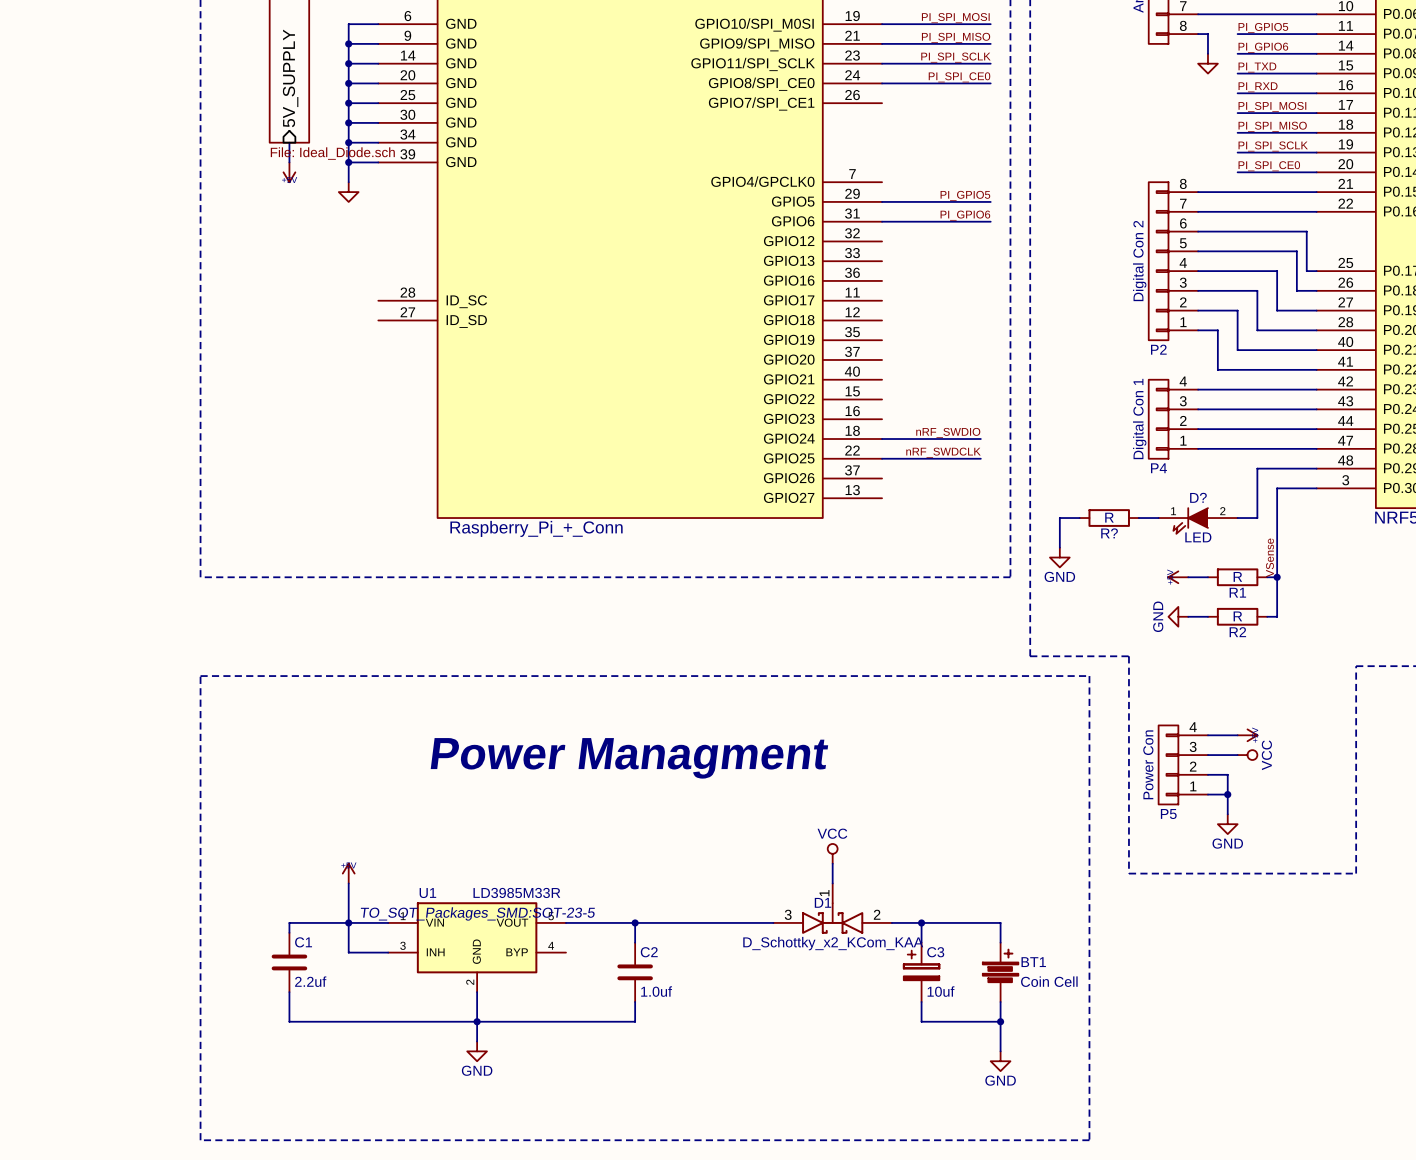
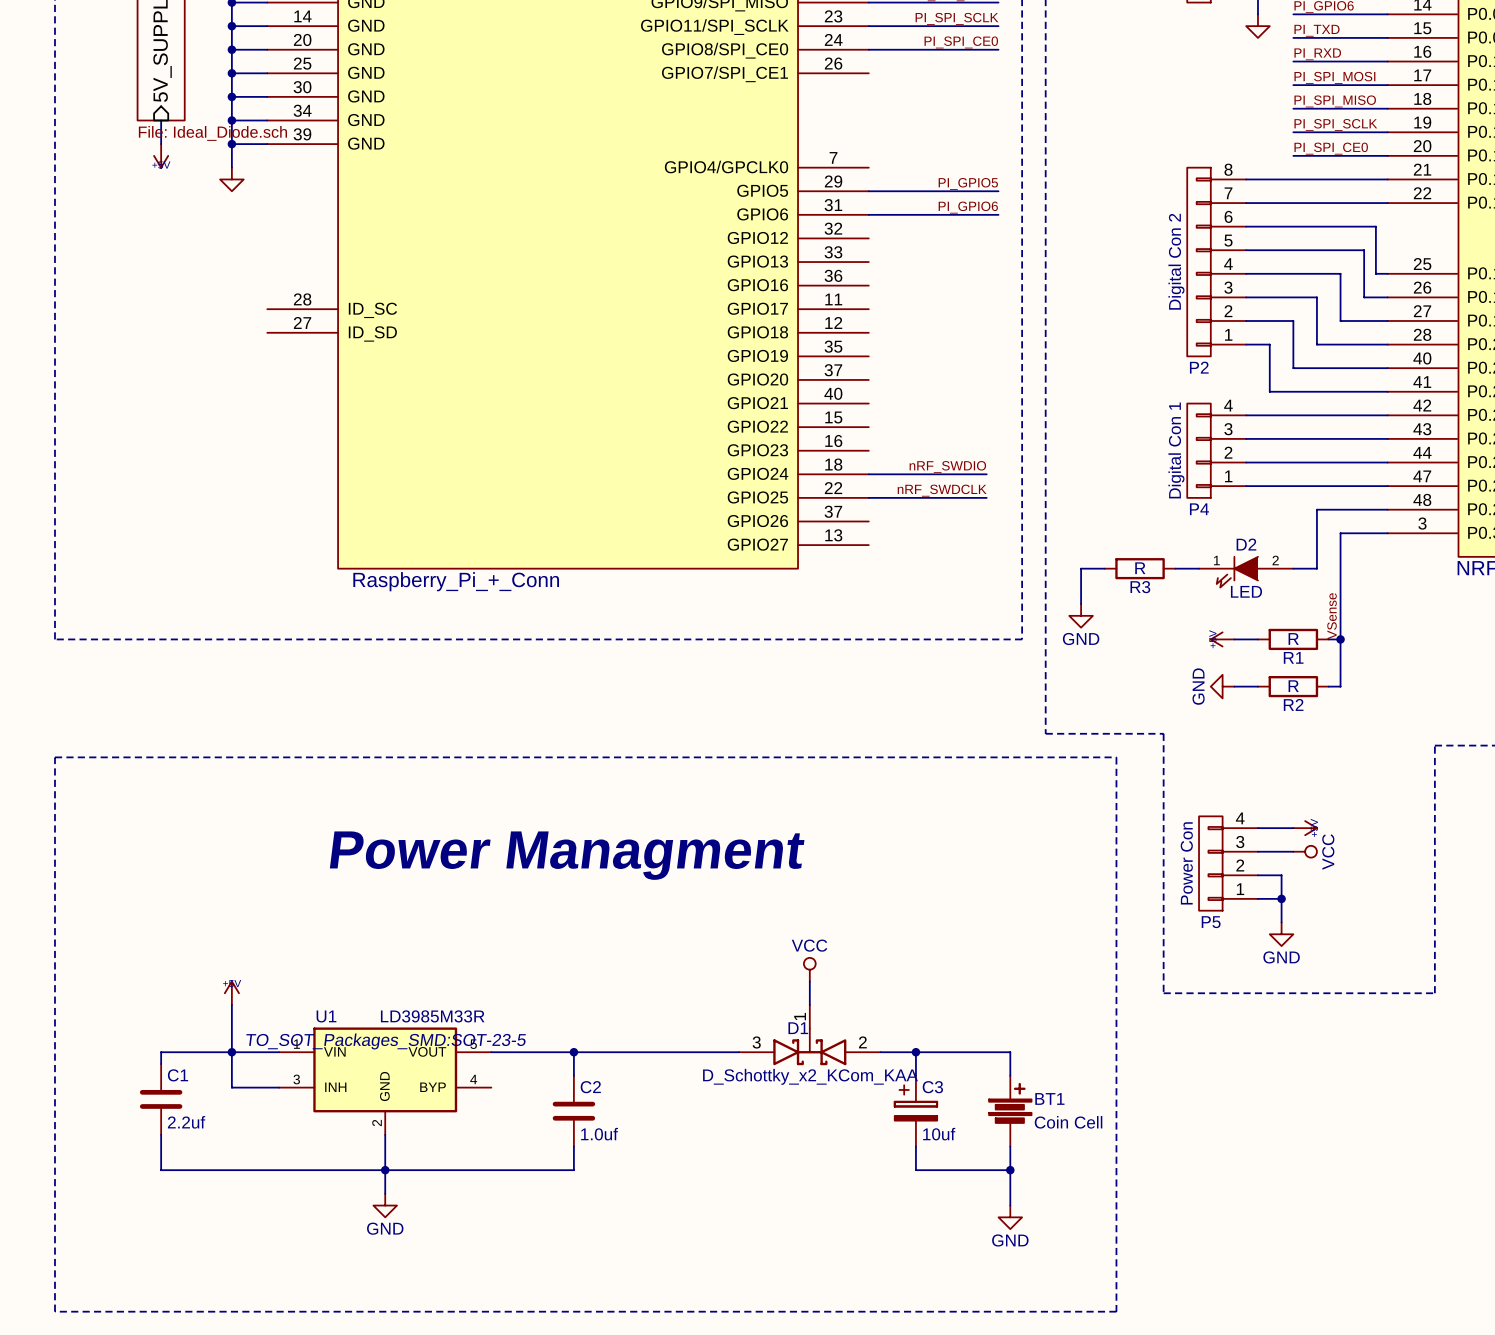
D? name: D? (1198, 497) -> D2 (1246, 544)
R? name: R? (1109, 533) -> R3 (1140, 587)

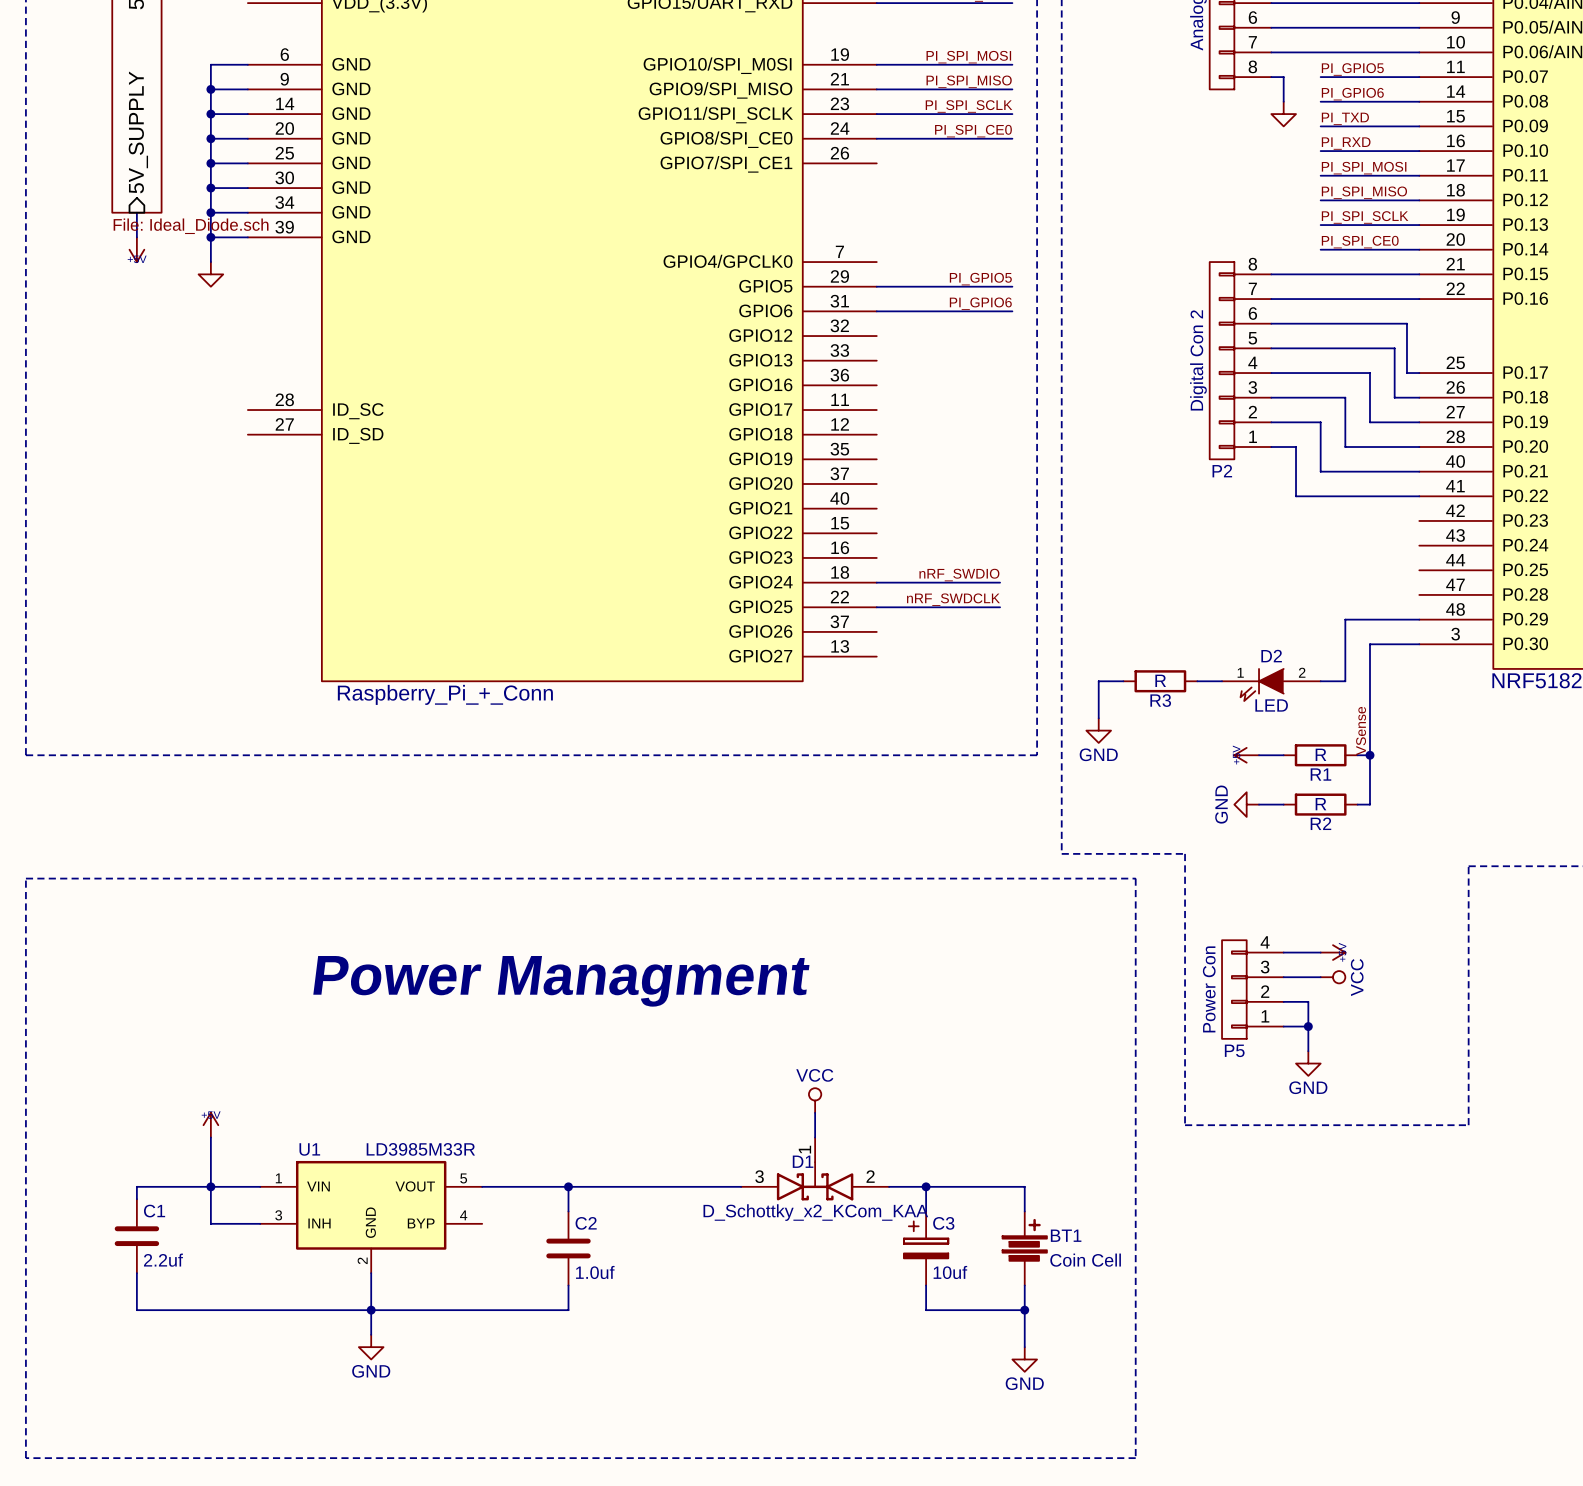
wire: (1246, 415) (1387, 415) -> none
wire: (1246, 438) (1387, 438) -> none
P4: Digital Con 1 (1216, 450) -> none
wire: (1246, 462) (1387, 462) -> none
wire: (1246, 486) (1387, 486) -> none
U1 text: TO_SOT_Packages_SMD:SOT-23-5 (386, 1041) -> none

